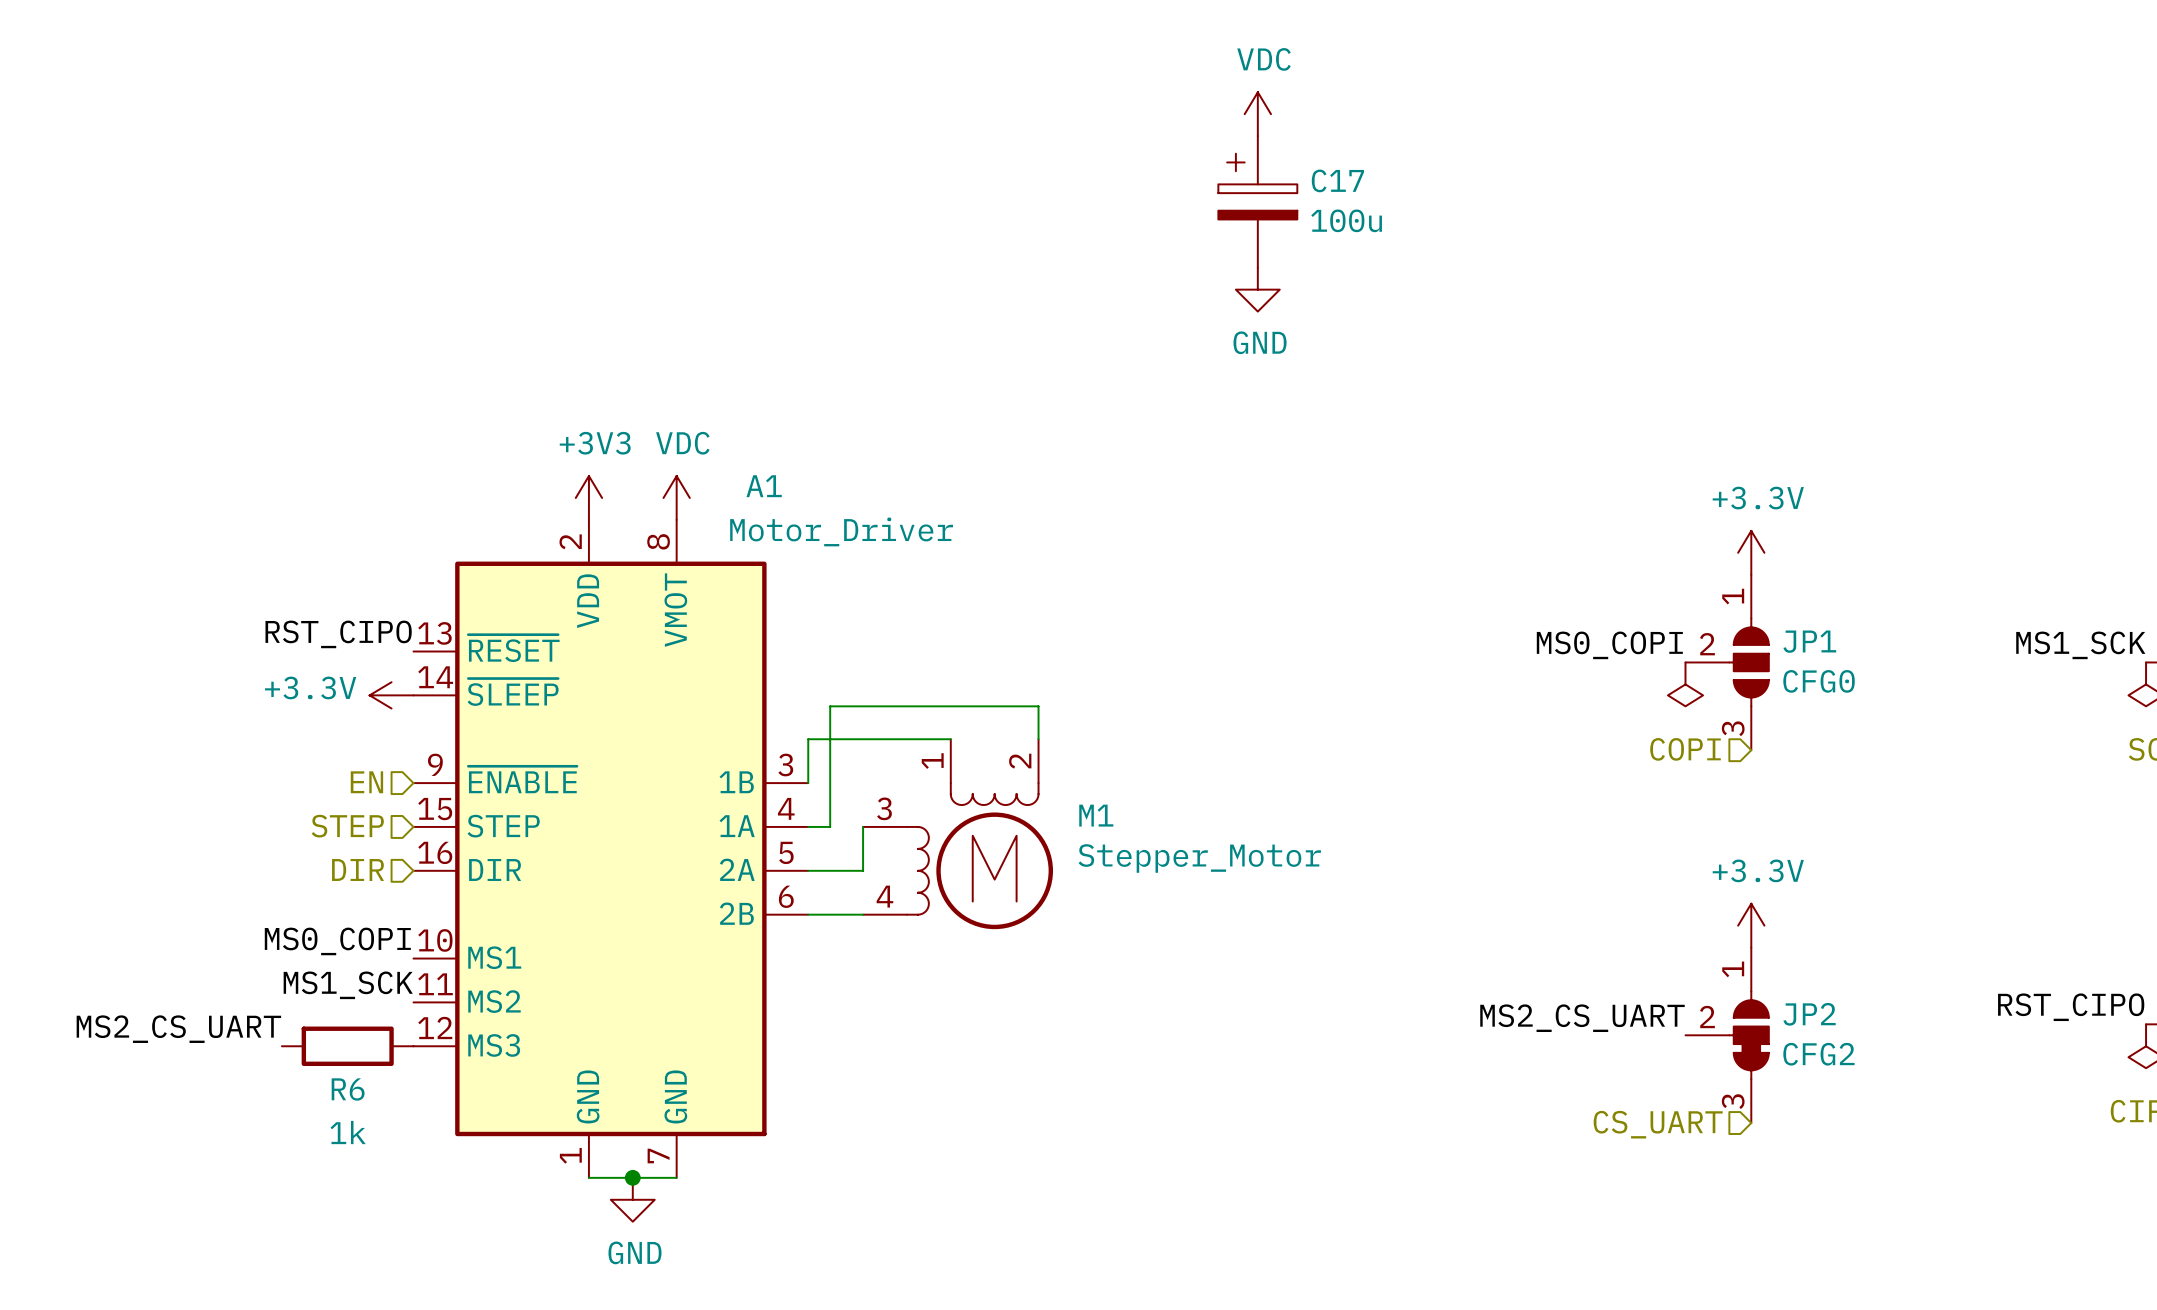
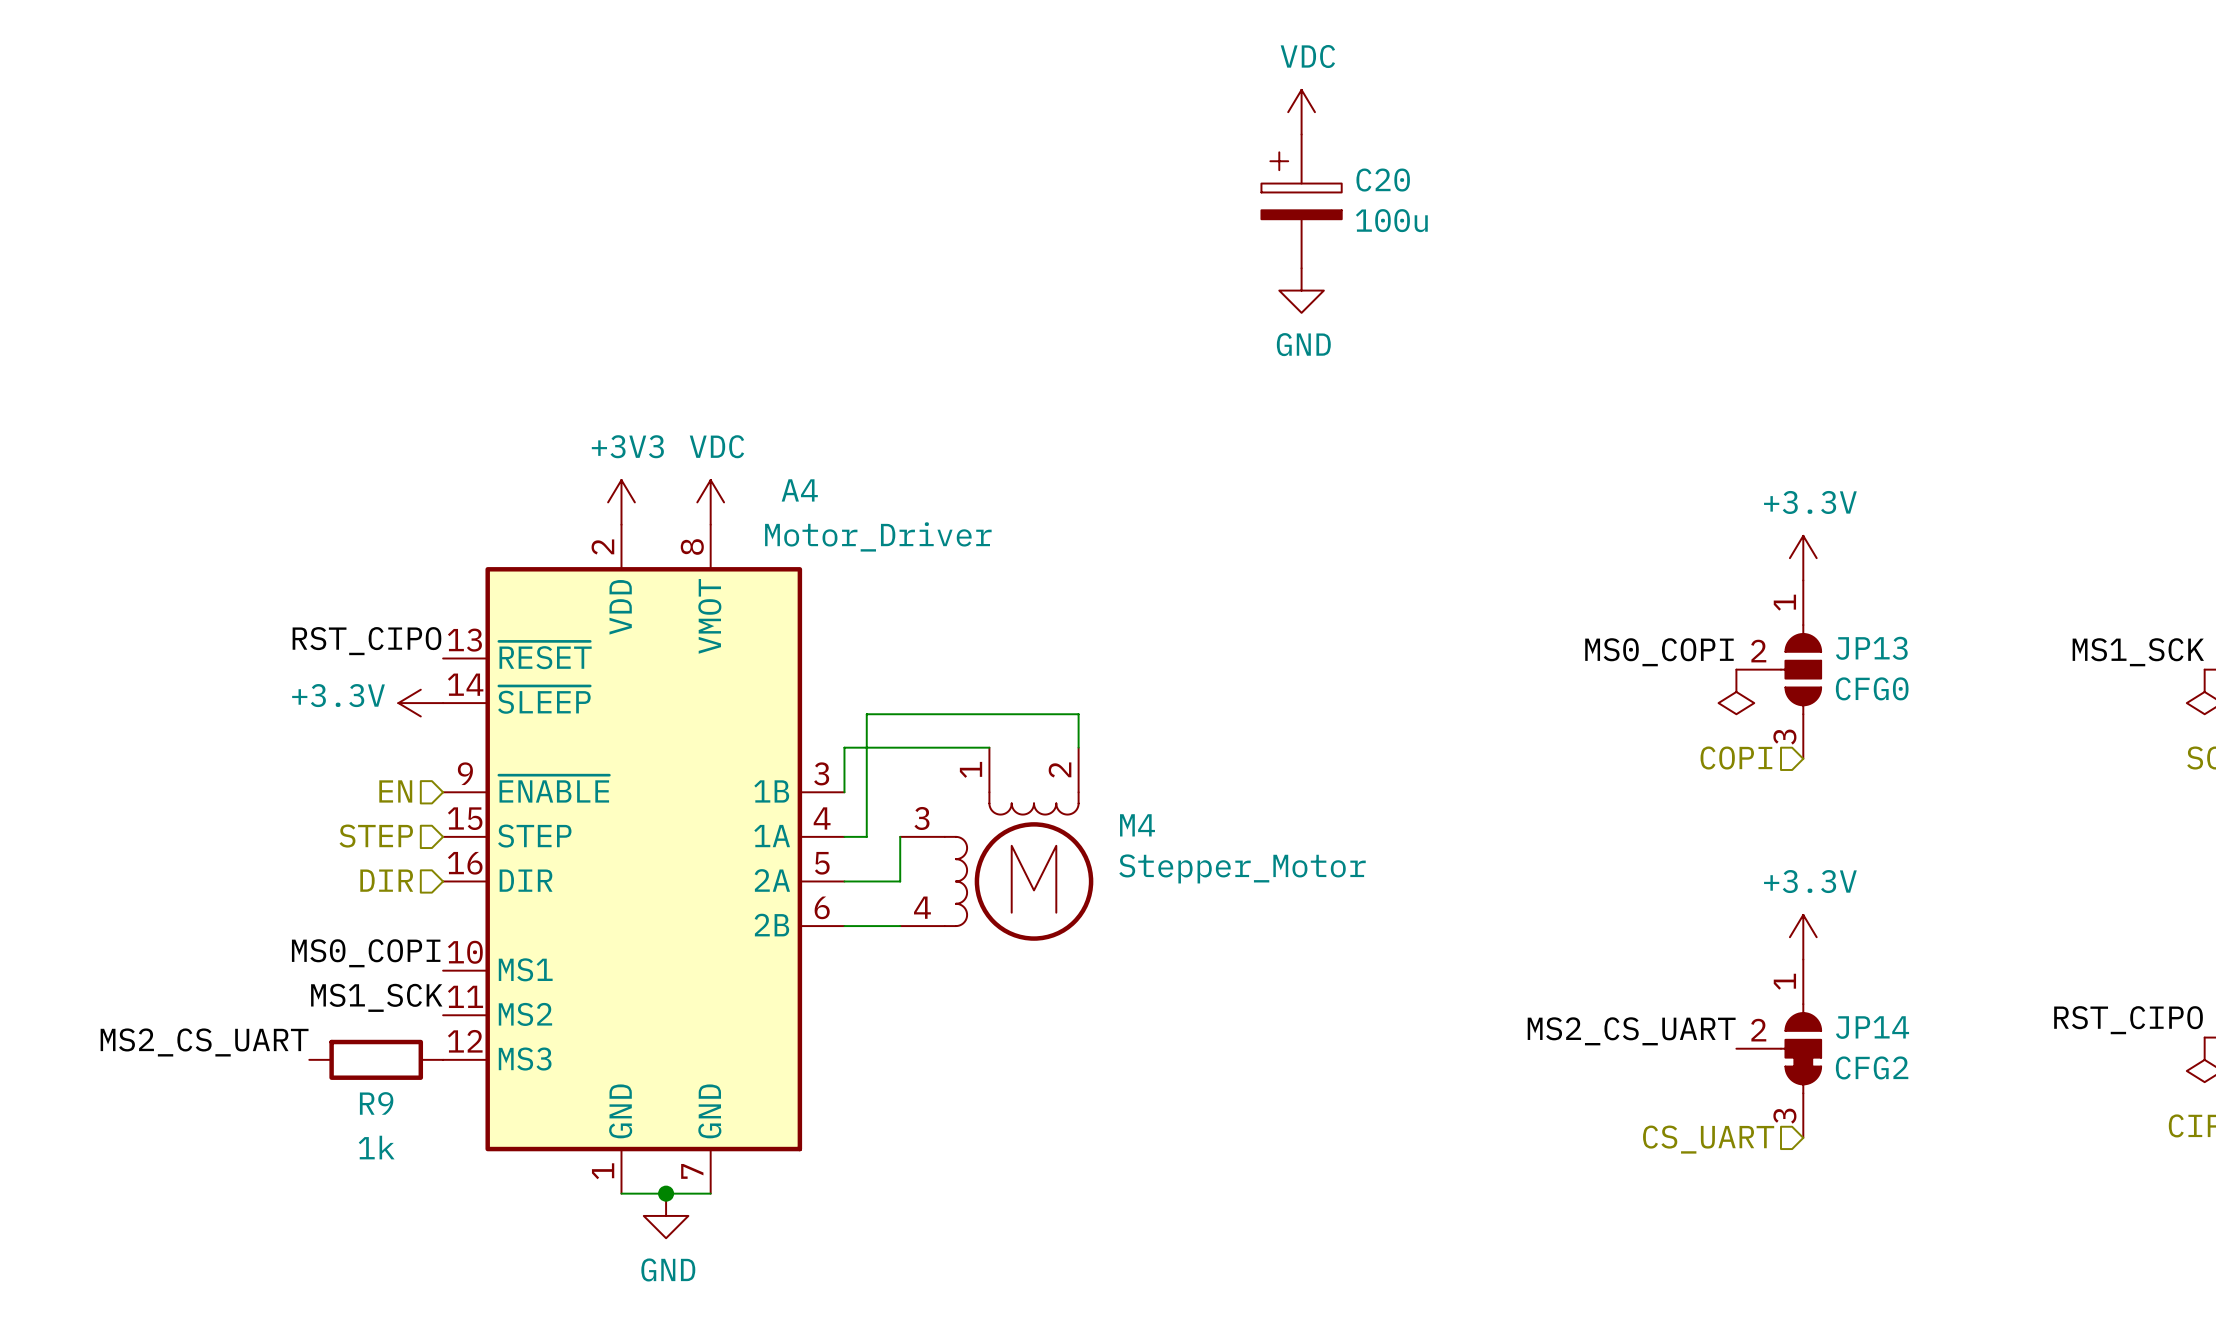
C17 name: C17 (1337, 180) -> C20 (1383, 180)
A1 name: A1 (764, 486) -> A4 (799, 490)
JP1 name: JP1 (1809, 641) -> JP13 (1871, 648)
M1 name: M1 (1096, 815) -> M4 (1137, 825)
JP2 name: JP2 (1809, 1014) -> JP14 (1872, 1027)
R6 name: R6 (348, 1089) -> R9 (376, 1103)

